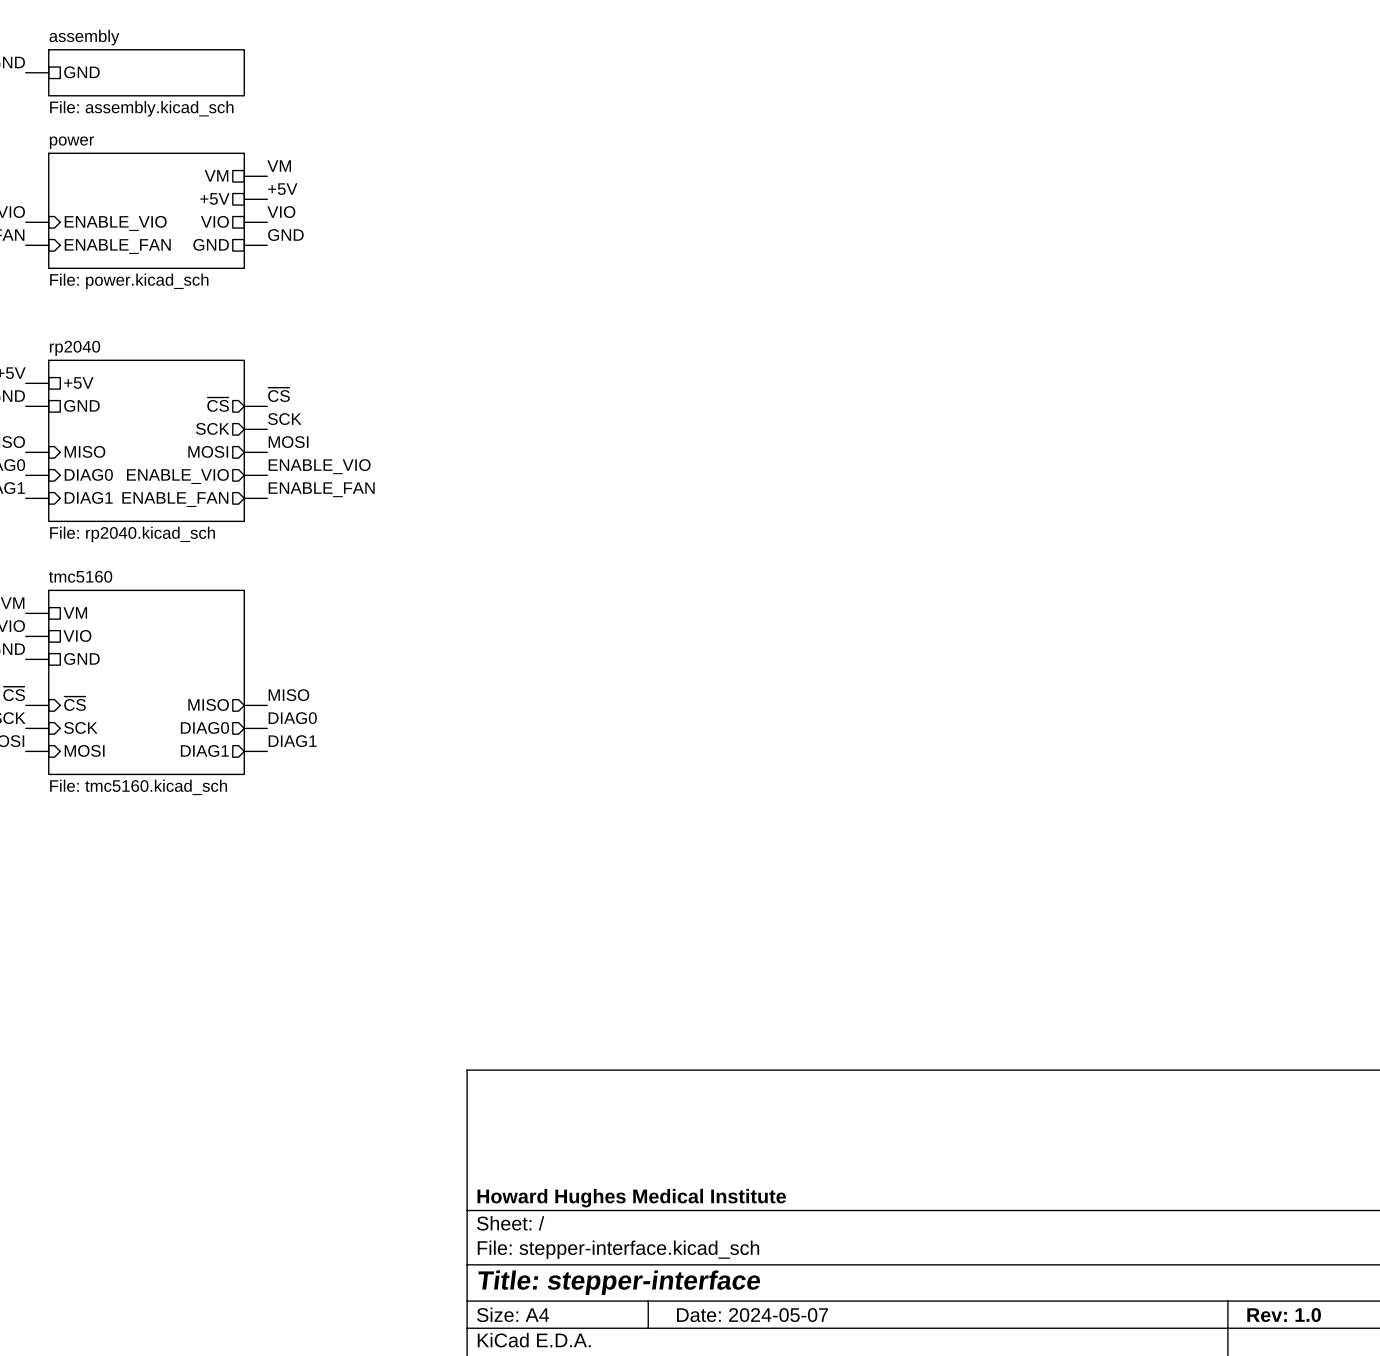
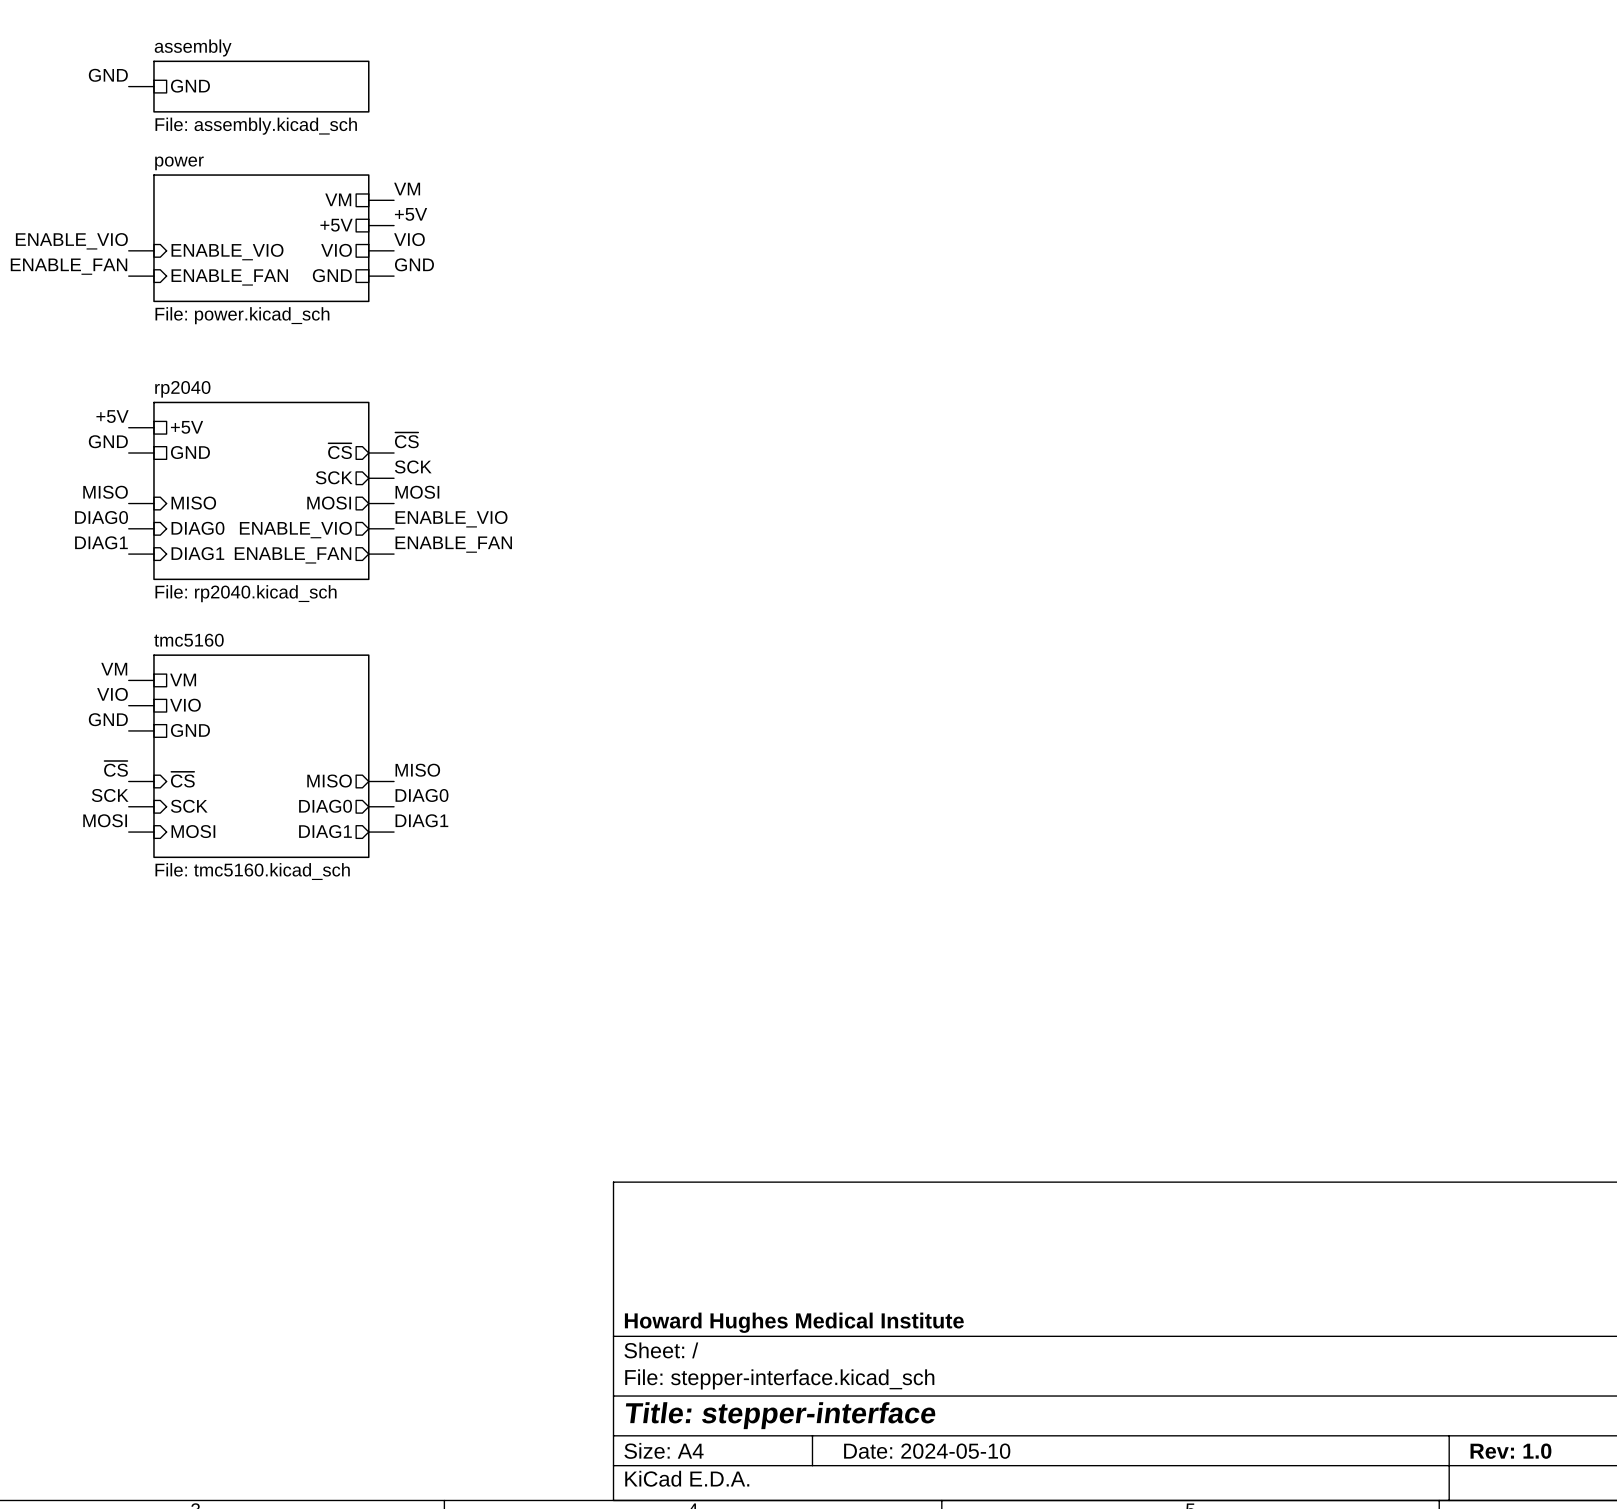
title block: Date: 2024-05-07 (752, 1315) -> Date: 2024-05-10 (927, 1451)

